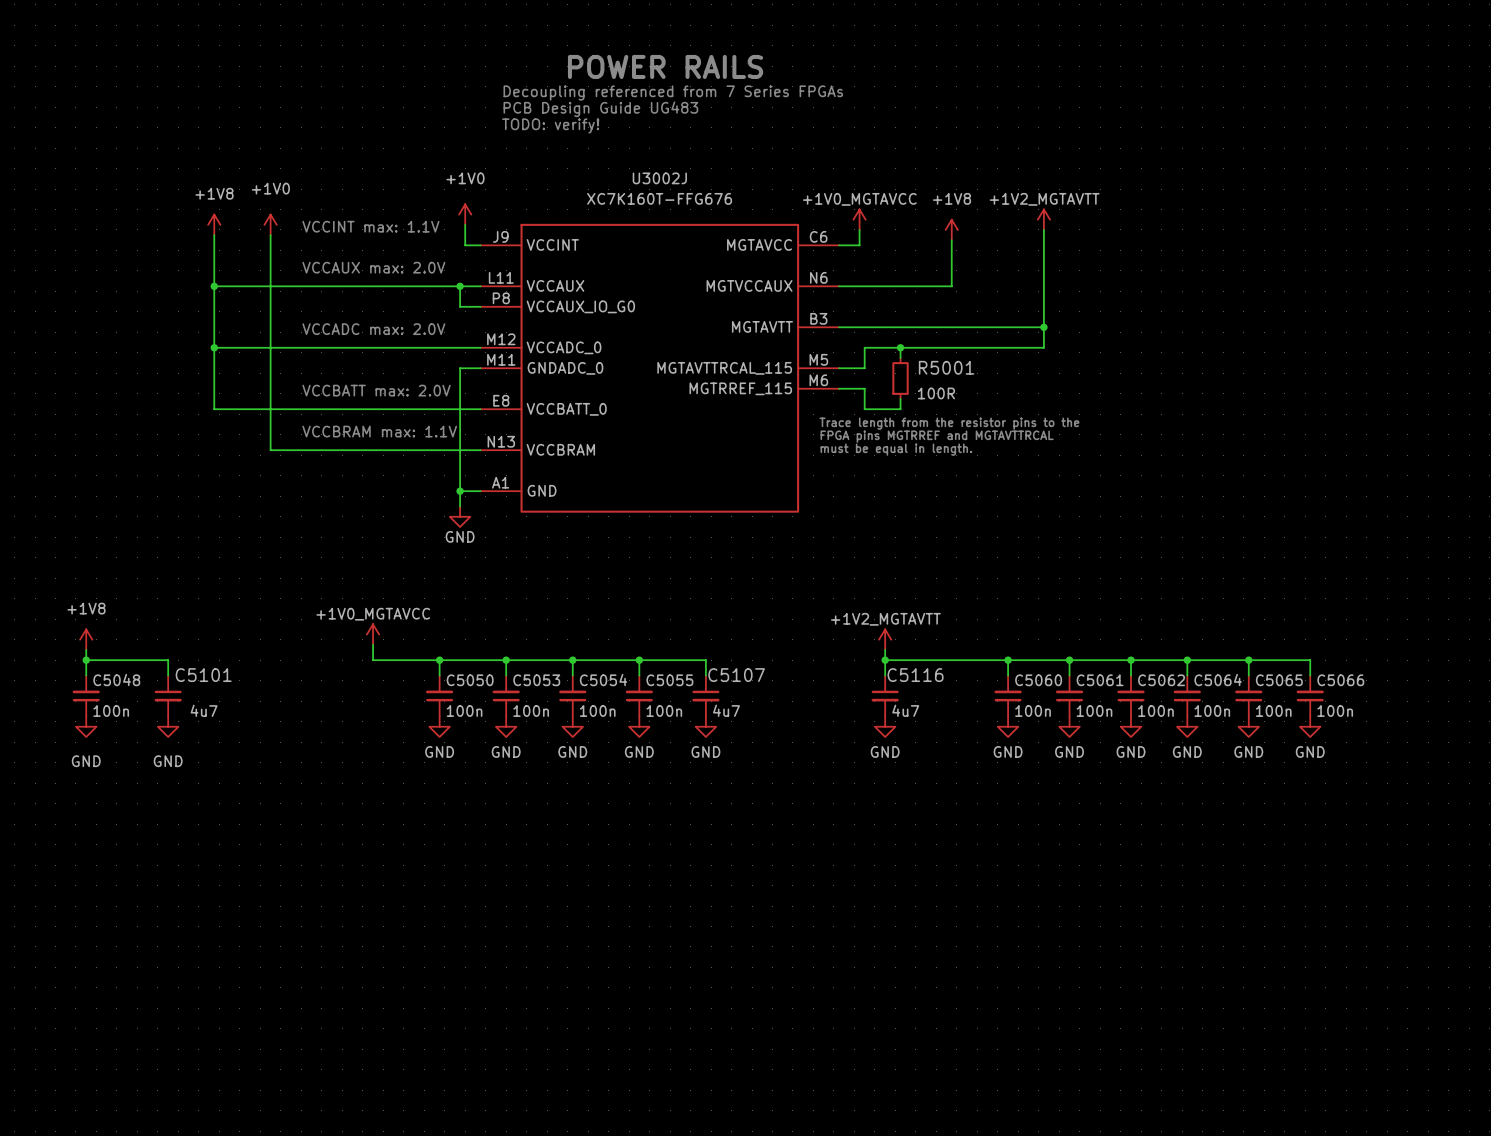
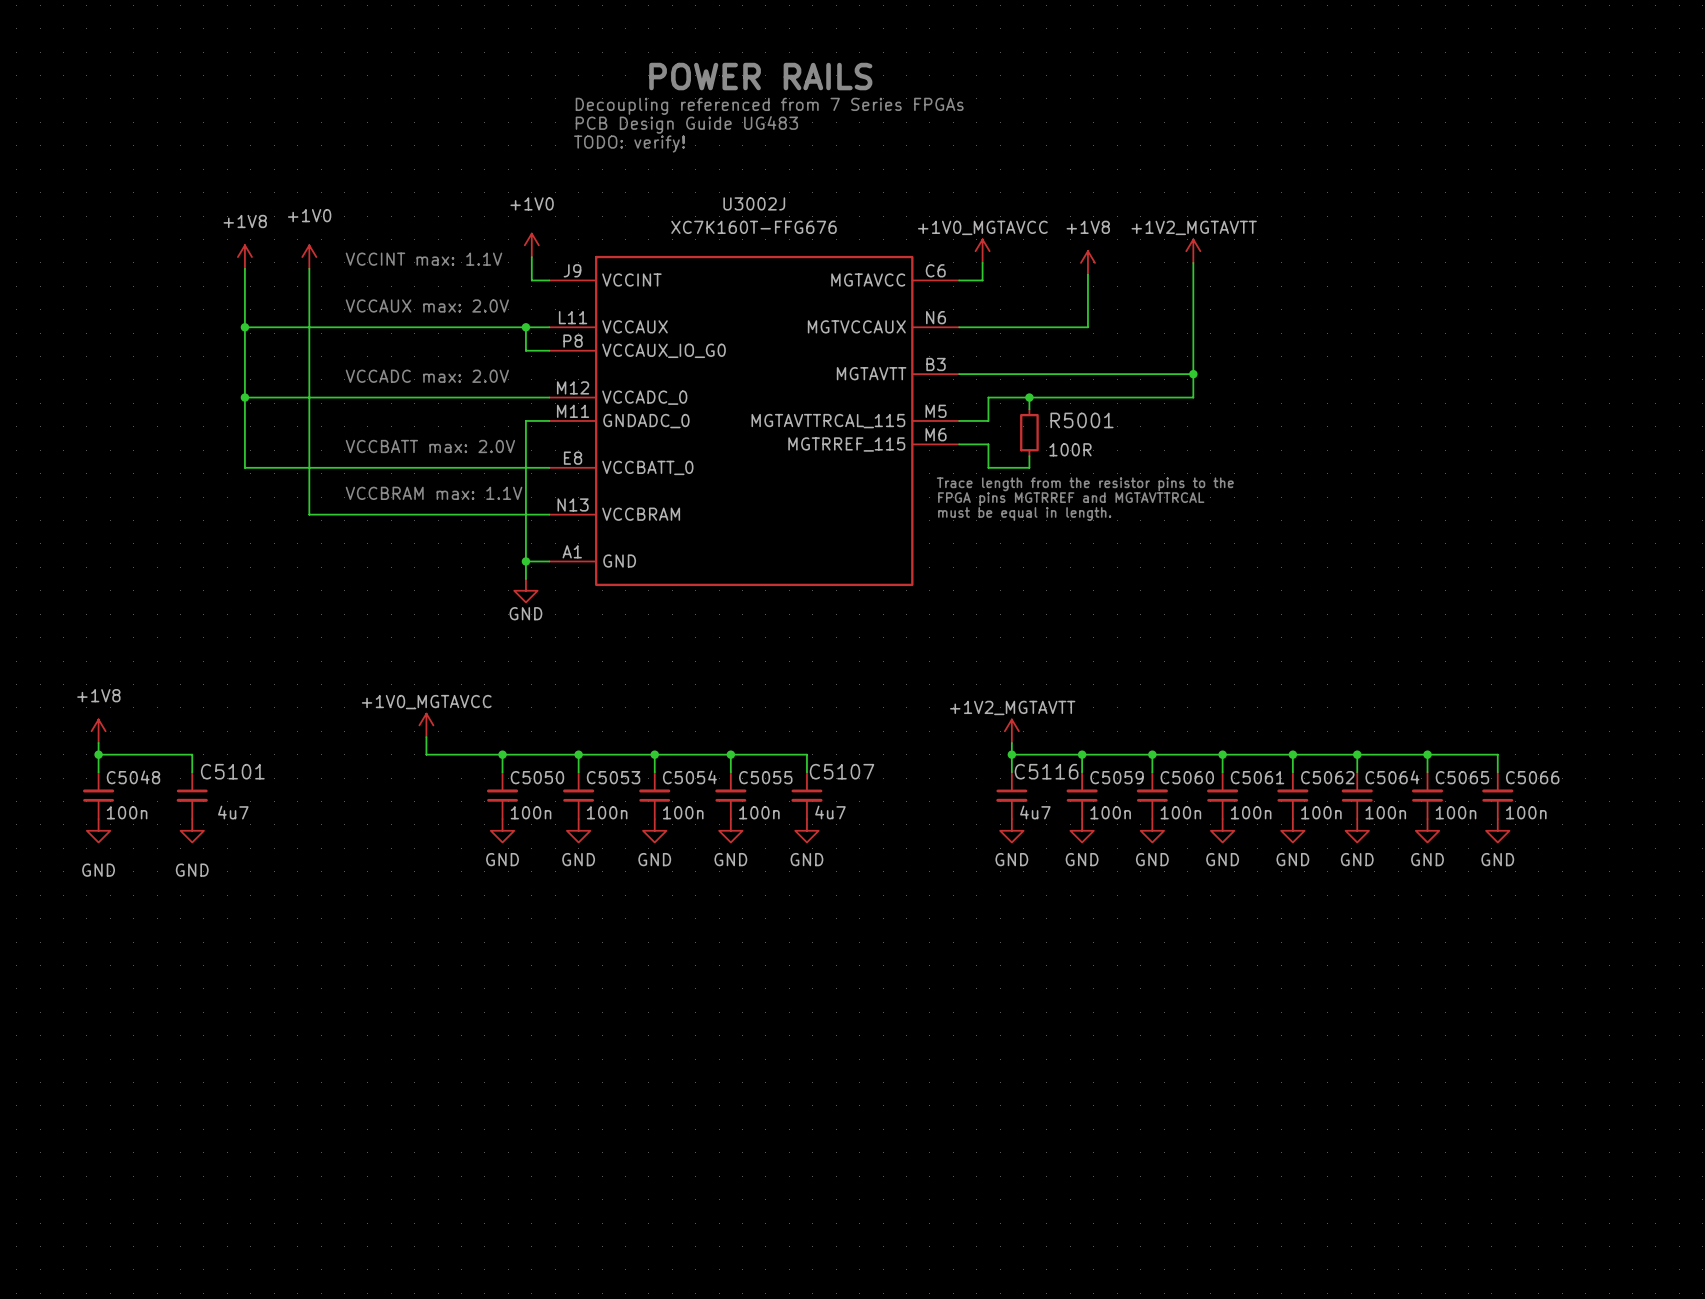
wire: none -> (1082, 754) (1082, 772)
junction: none -> (1082, 754)
C5059: none -> (1082, 795)
power symbol: none -> GND (1082, 830)

